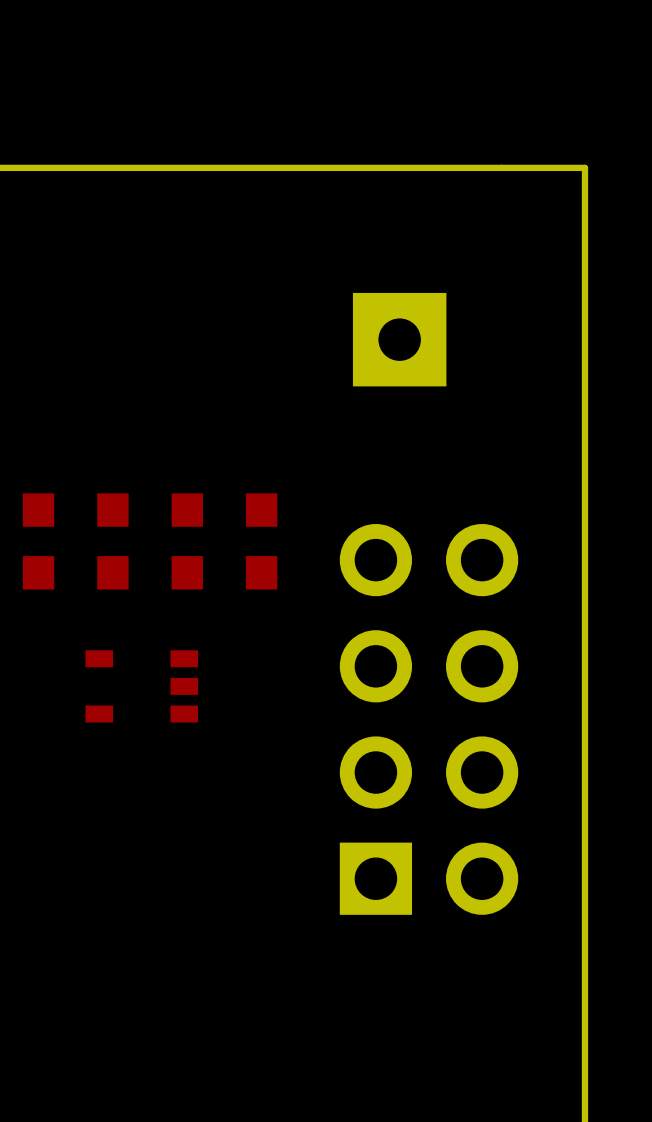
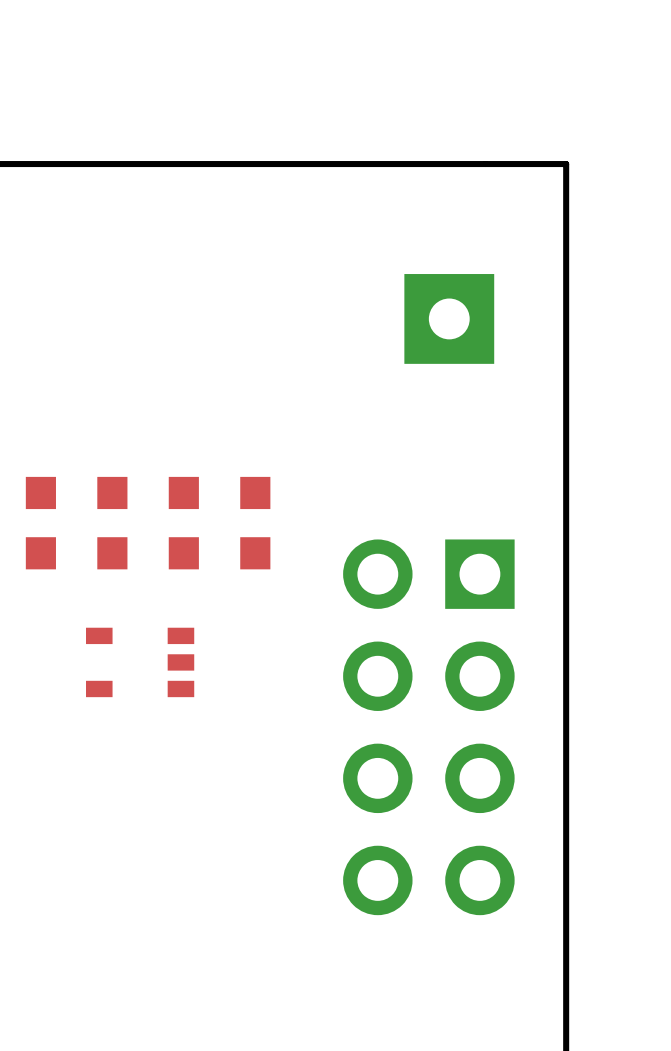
part position: (399, 339) -> (449, 318)
part rotation: 0° (429, 719) -> 180° (428, 727)

